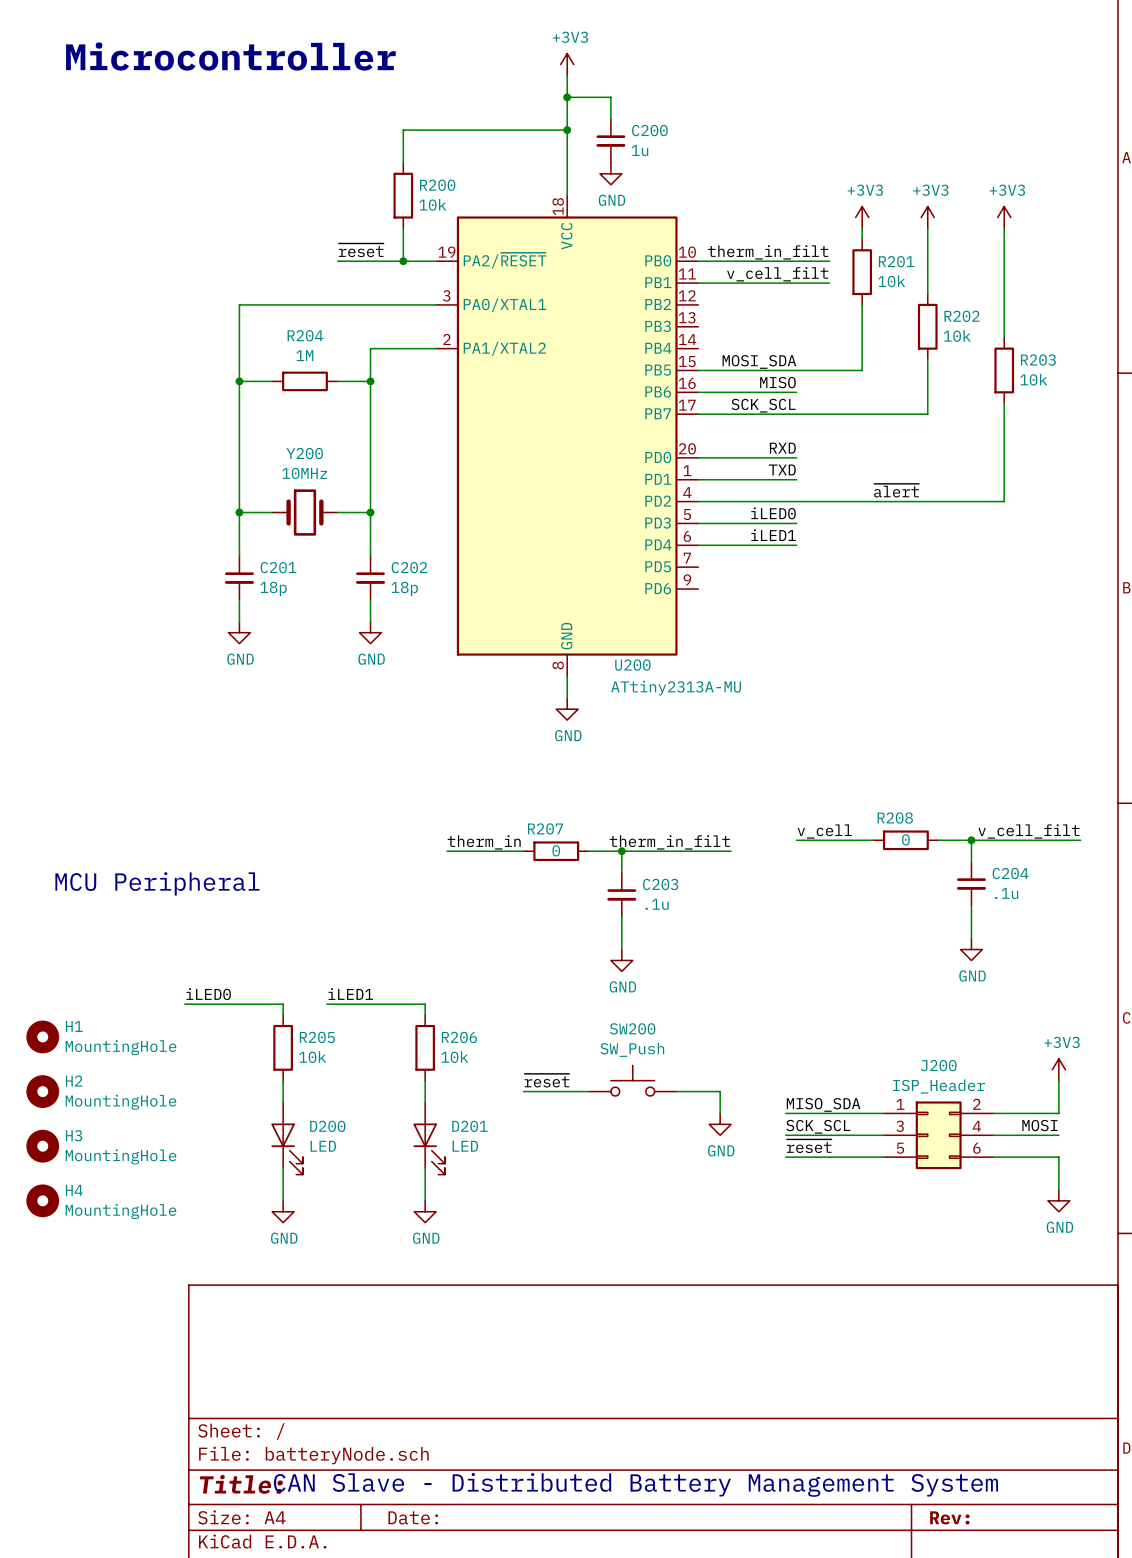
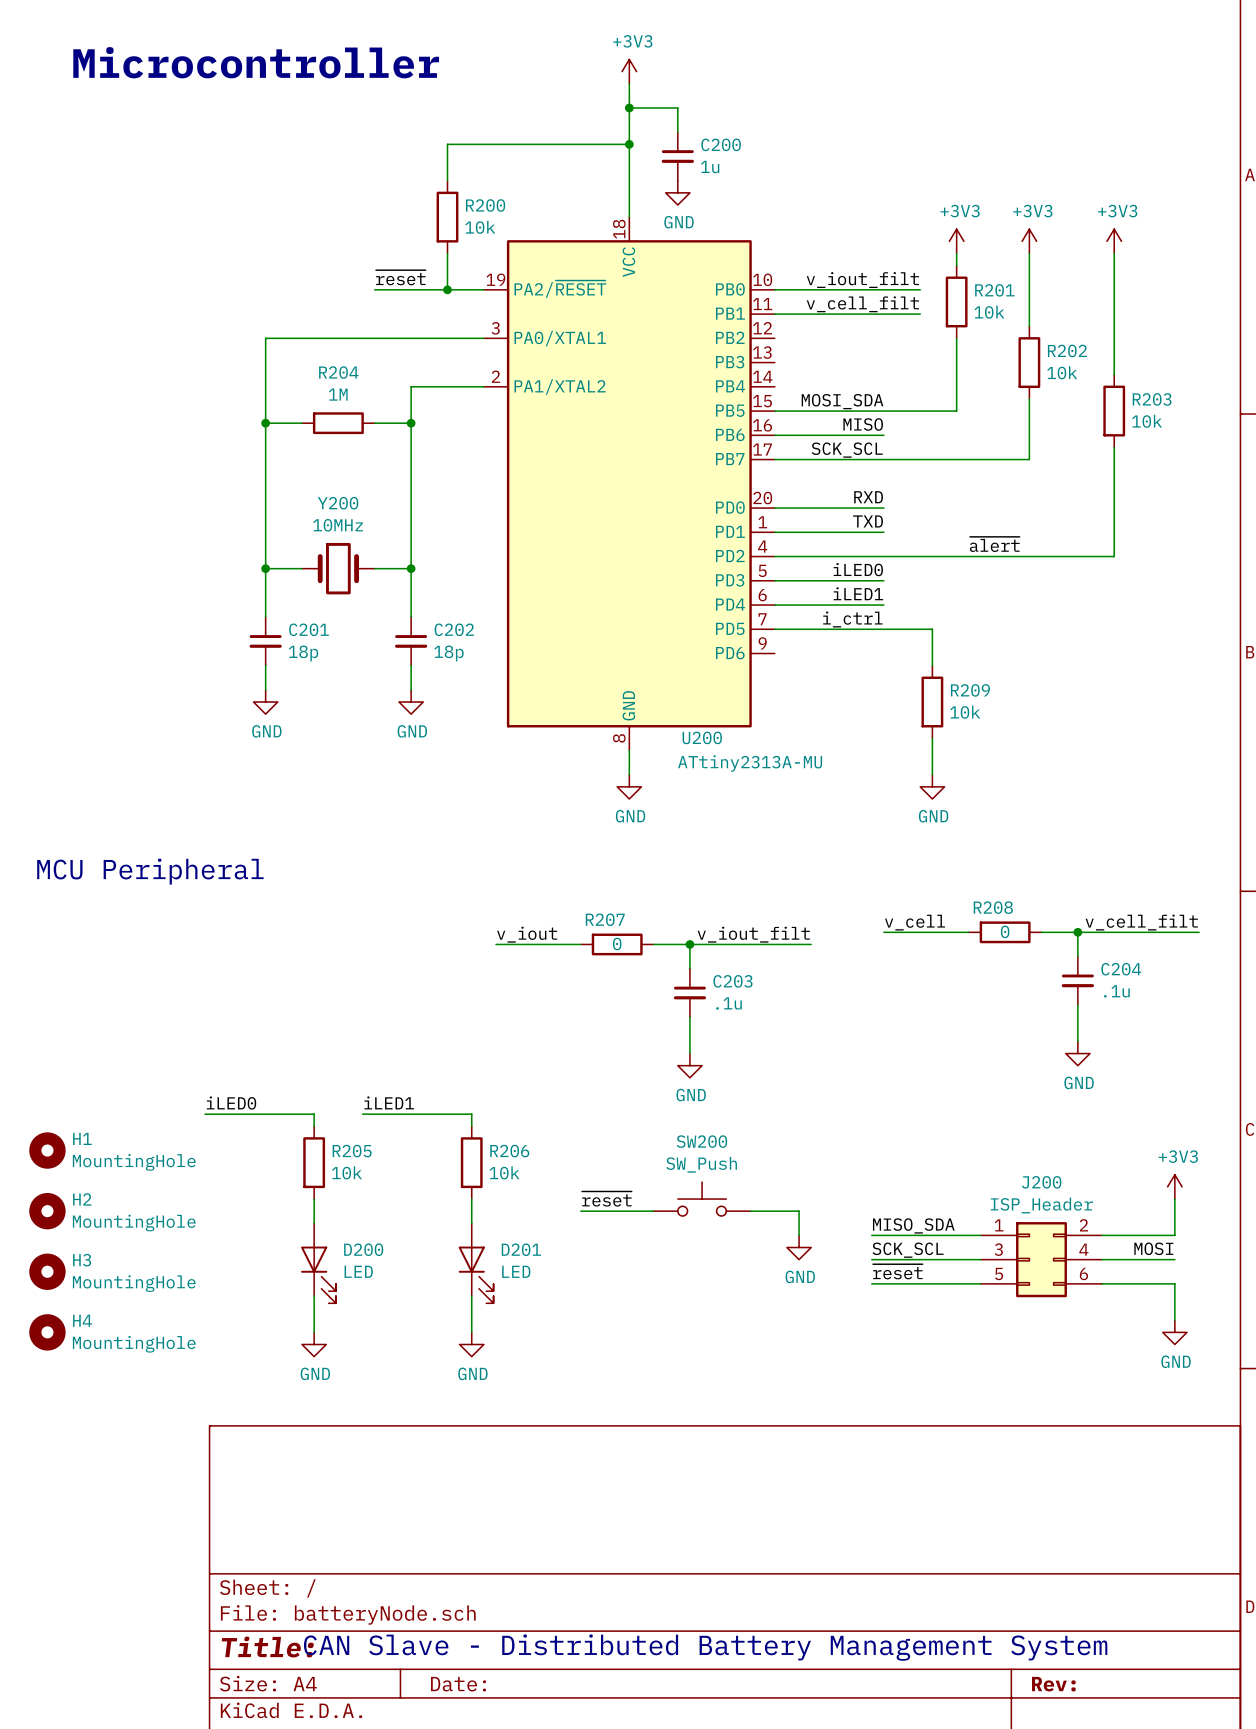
label: therm_in_filt (768, 252) -> v_iout_filt (862, 280)
label: none -> i_ctrl (852, 619)
wire: none -> (774, 629) (932, 629) (932, 665)
R209: none -> 10k (932, 702)
wire: none -> (932, 738) (932, 774)
power symbol: none -> GND (932, 786)
label: therm_in (484, 842) -> v_iout (527, 934)
label: therm_in_filt (669, 842) -> v_iout_filt (753, 934)
text position: MCU Peripheral (157, 883) -> MCU Peripheral (150, 871)

